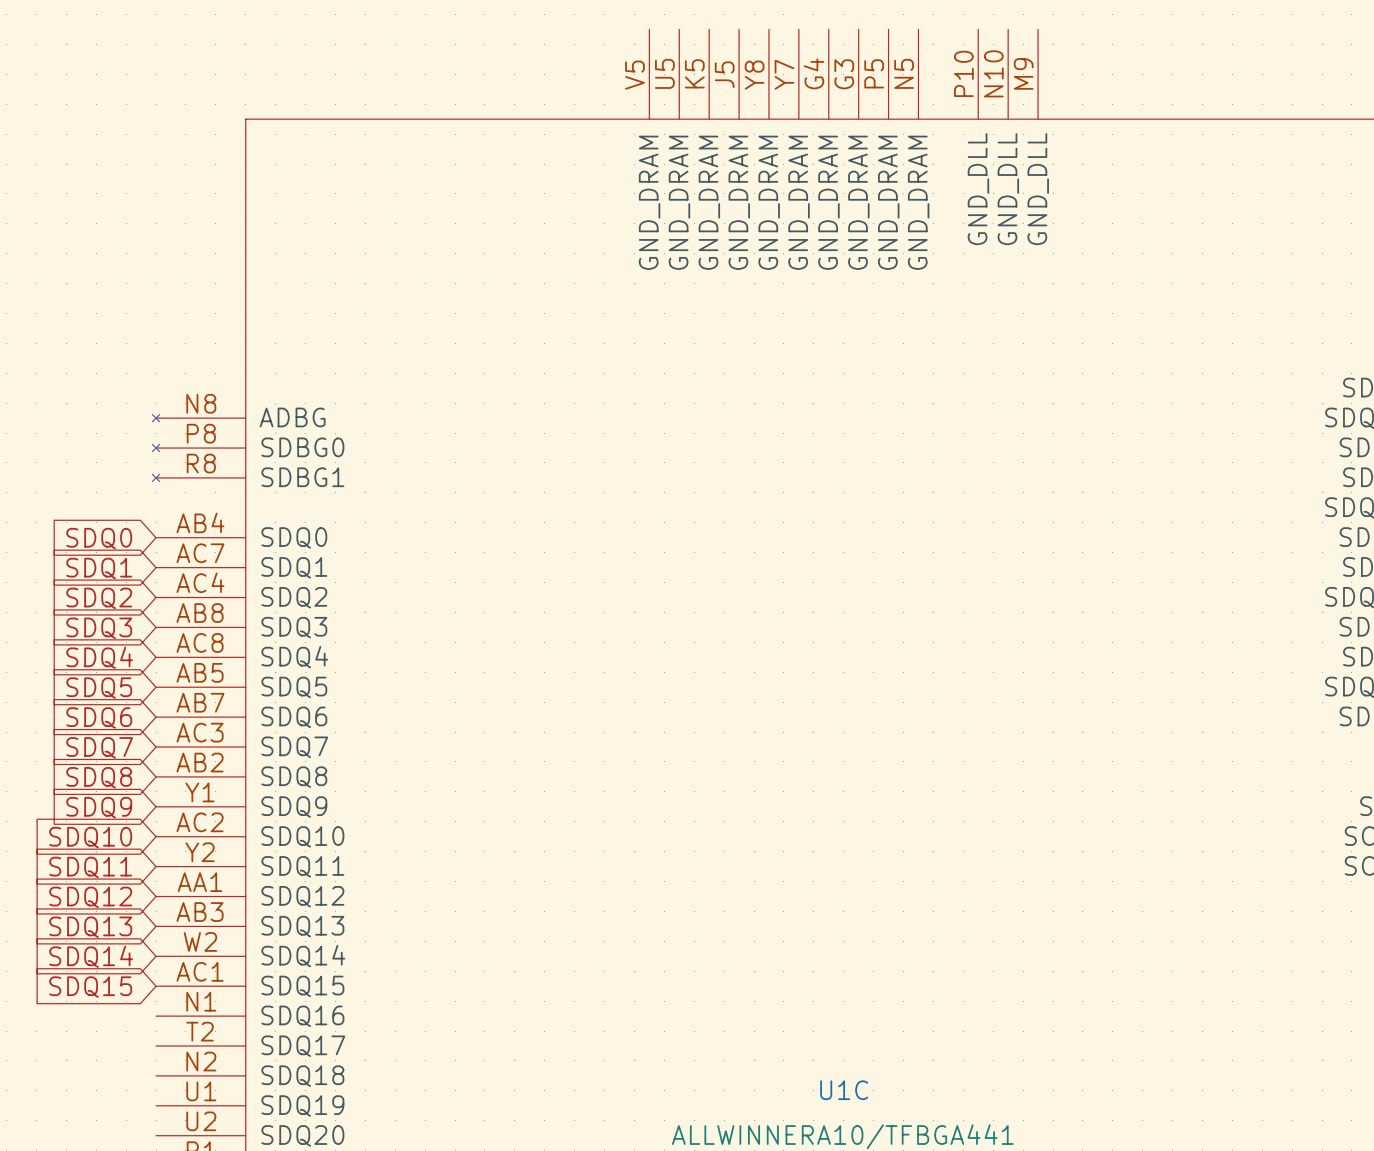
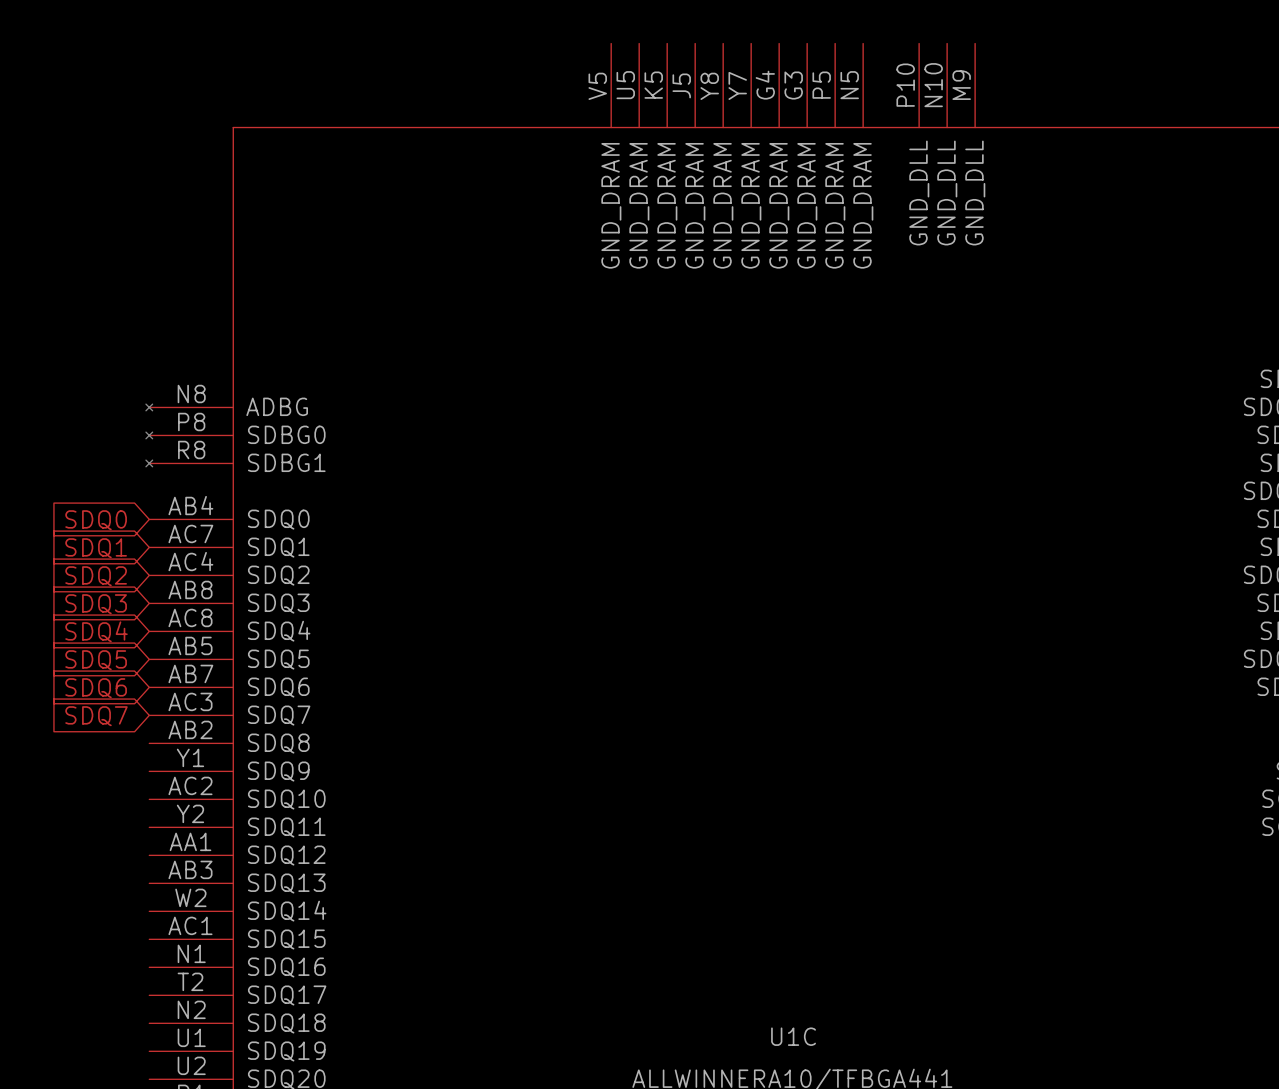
global label: SDQ8 (99, 777) -> none
global label: SDQ9 (99, 807) -> none
global label: SDQ10 (90, 837) -> none
global label: SDQ11 (90, 867) -> none
global label: SDQ12 (90, 897) -> none
global label: SDQ13 (90, 927) -> none
global label: SDQ14 (91, 956) -> none
global label: SDQ15 (90, 987) -> none

